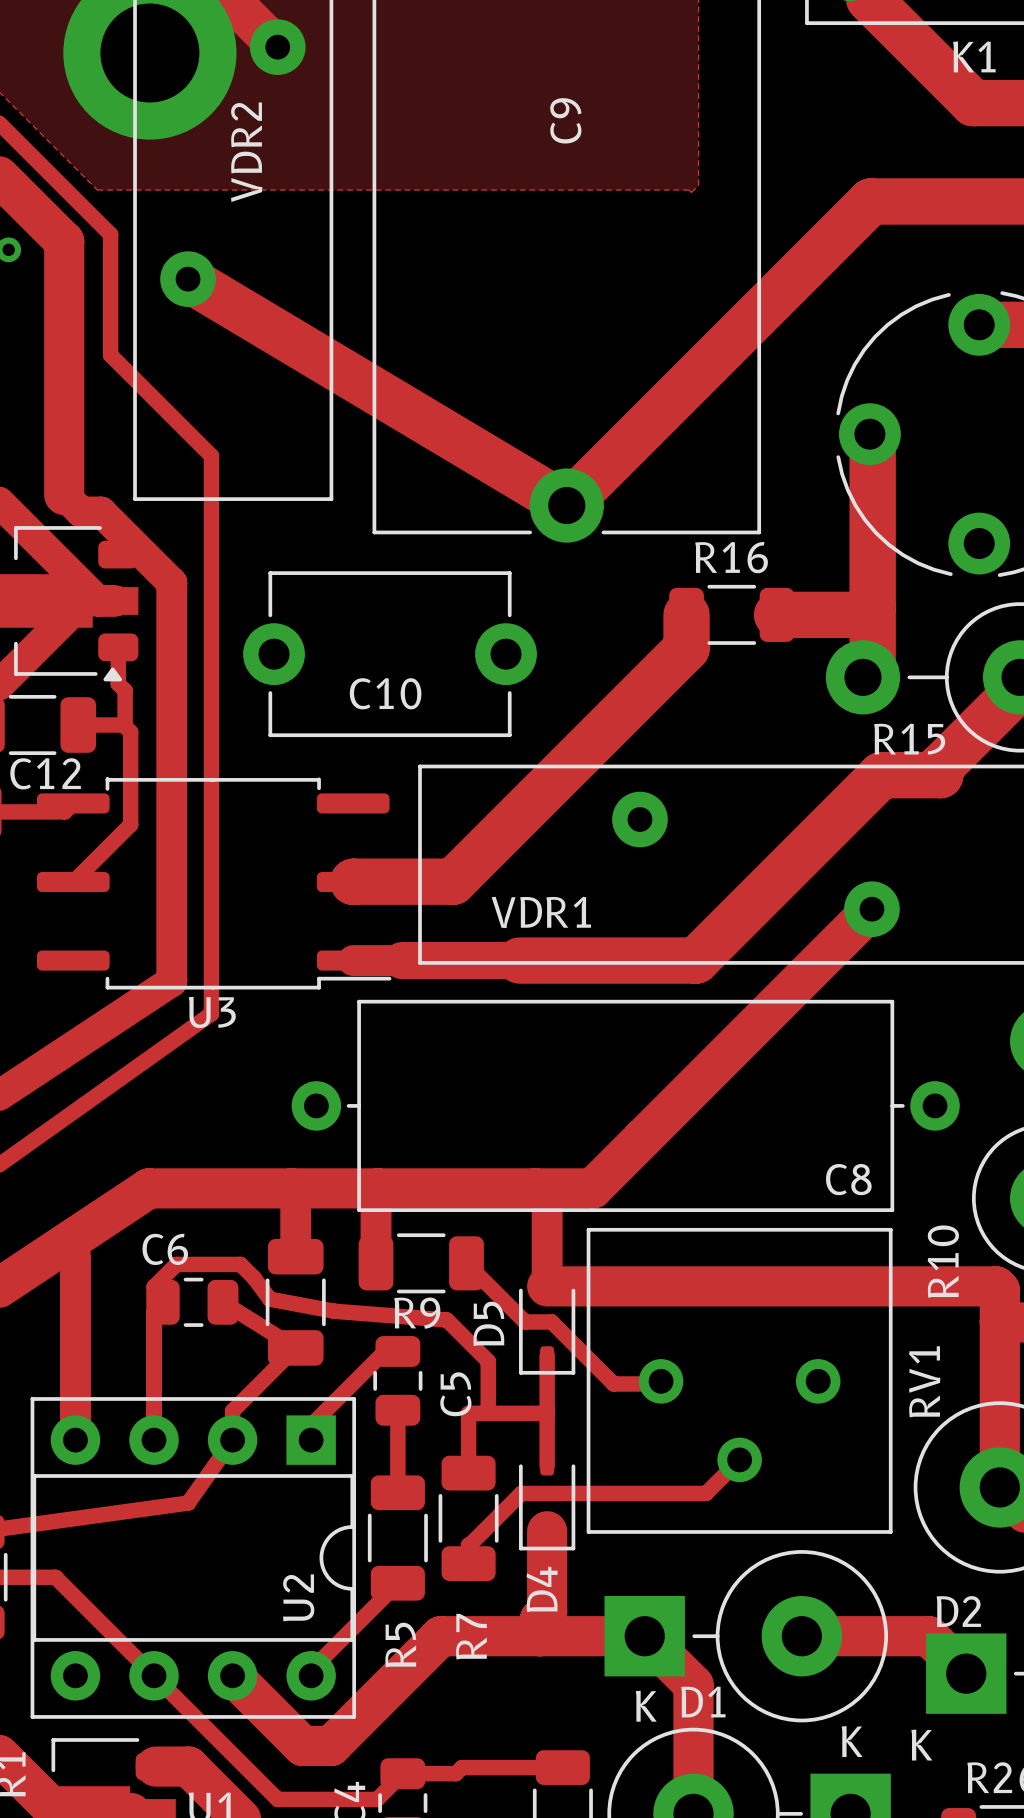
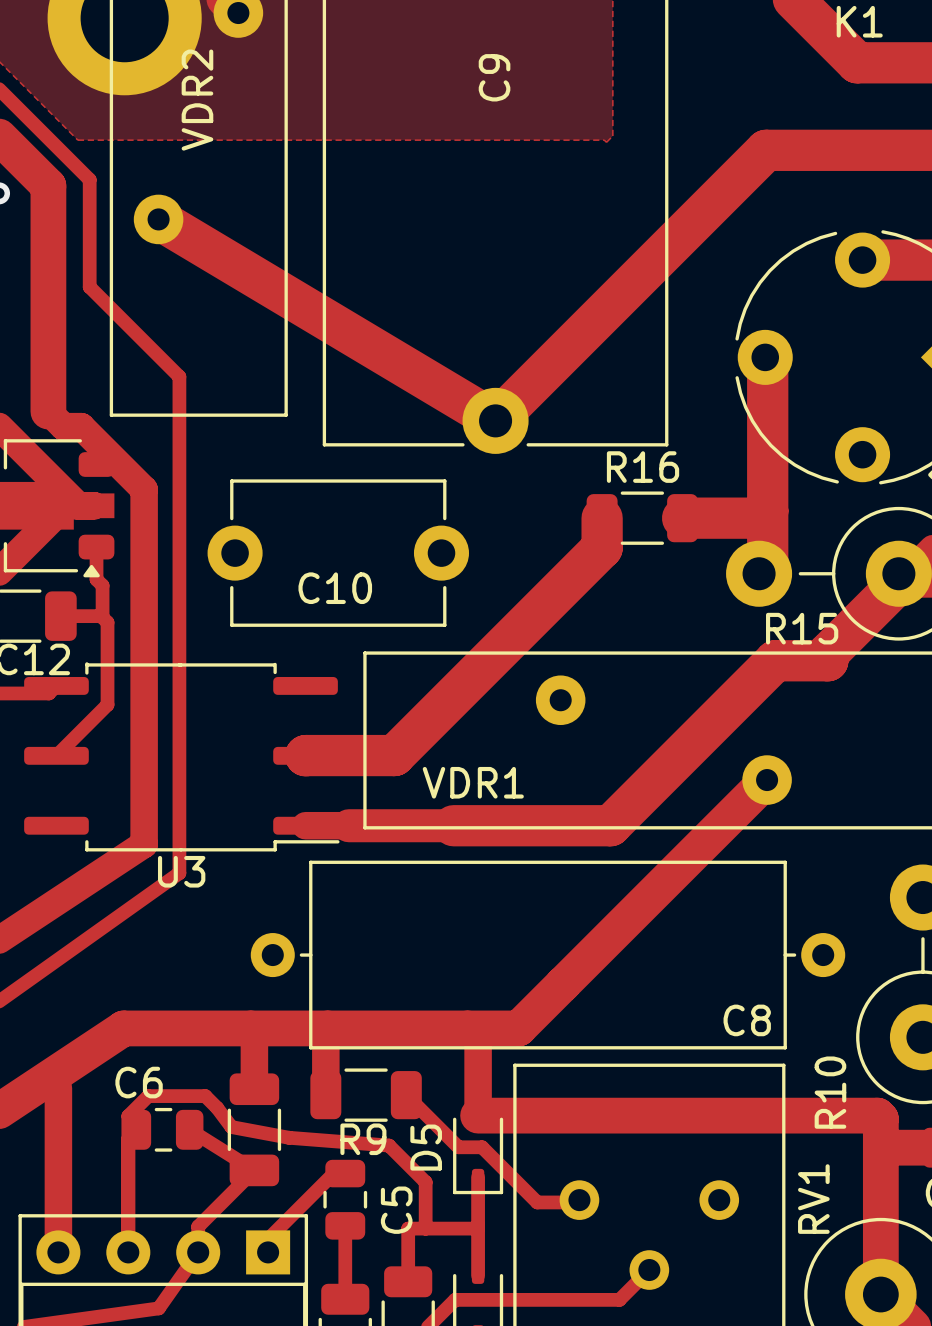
VDR2 name position: VDR2 (246, 152) -> VDR2 (197, 100)

